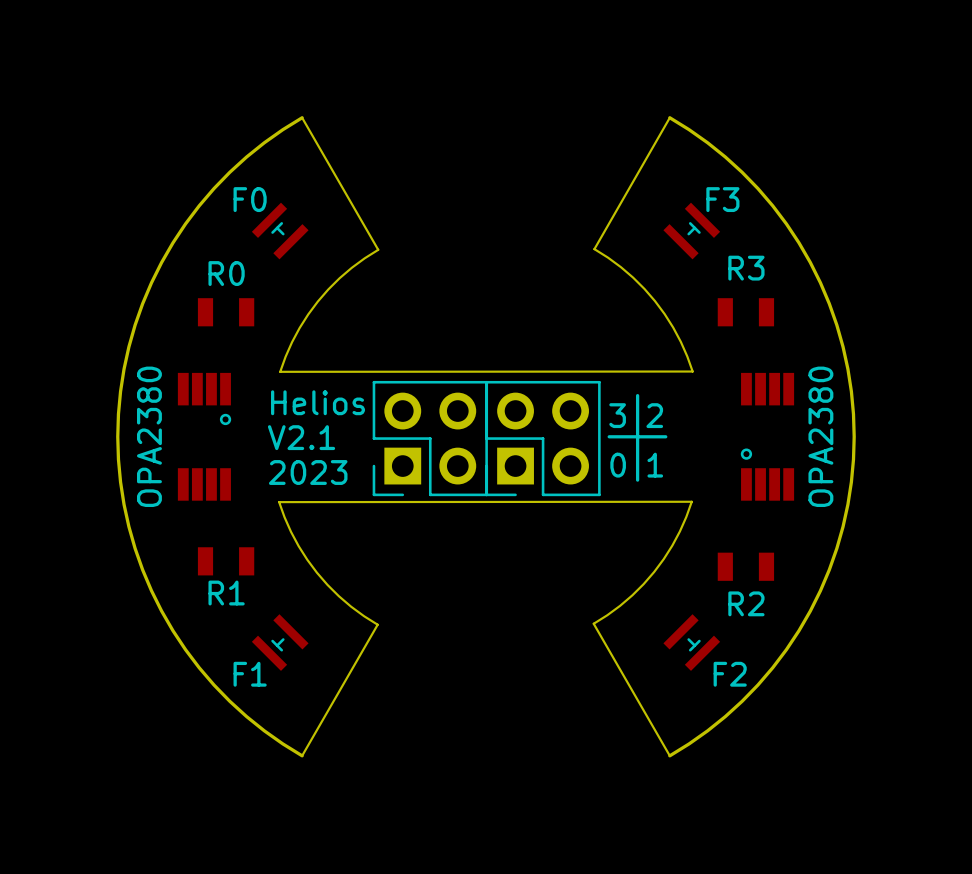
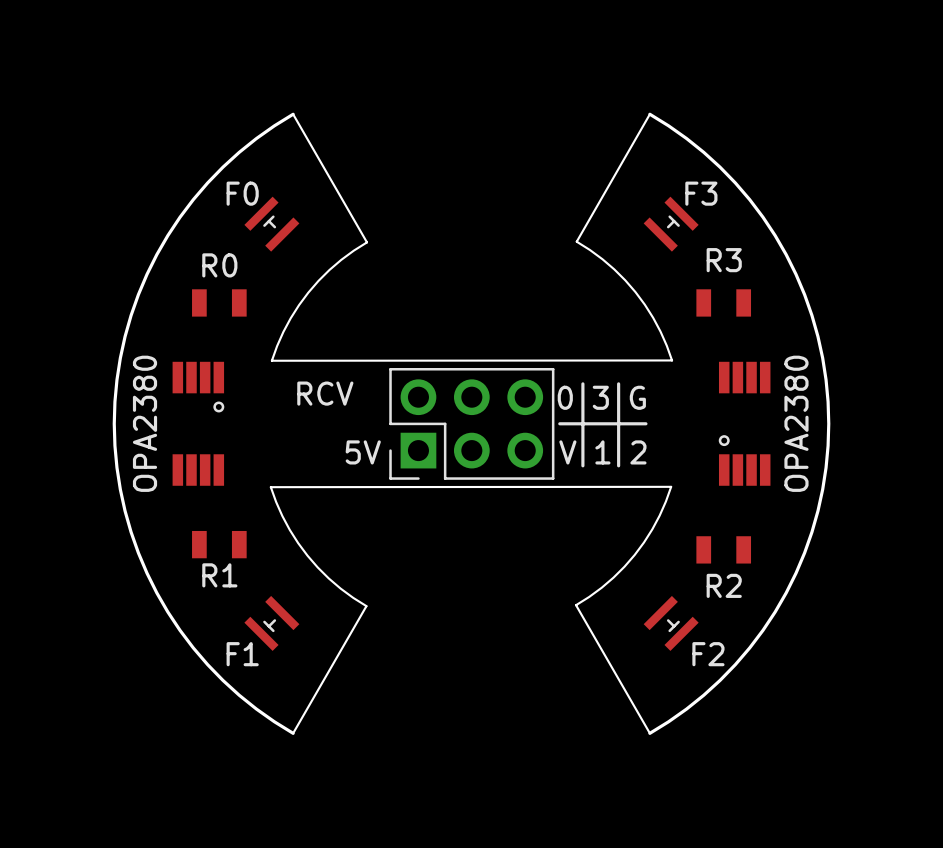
line: none -> (582, 383) (582, 465)
text: Helios (318, 402) -> none
text: none -> RCV (325, 393)
text: 3 2 (636, 415) -> 0 3 G (601, 397)
part: none -> (471, 423)
line: none -> (559, 423) (591, 423)
text: V2.1 (301, 437) -> none
part: (430, 438) -> none
part: (543, 438) -> none
text: 0 1 (636, 465) -> V 1 2 (602, 452)
text: none -> 5V (363, 452)
text: 2023 (308, 472) -> none

